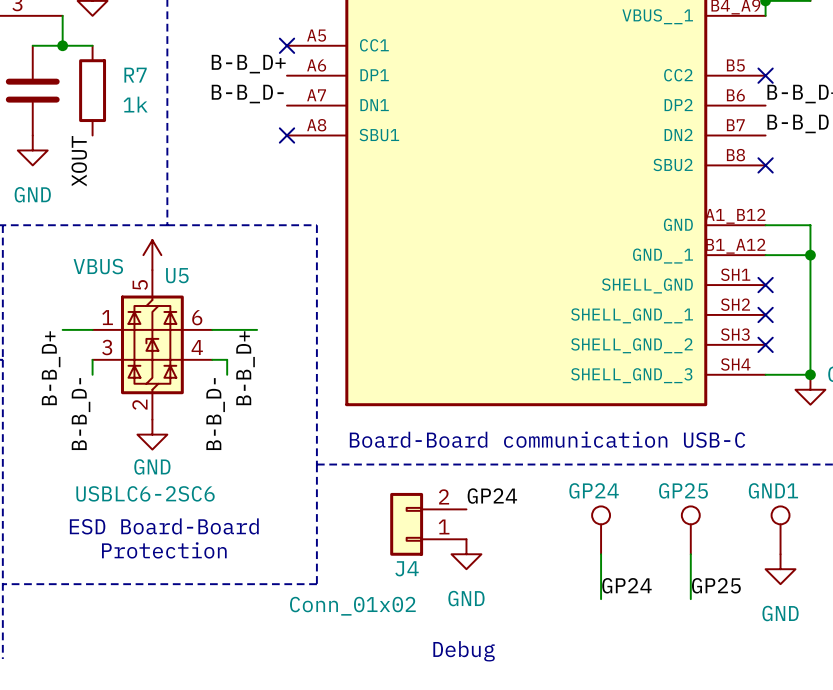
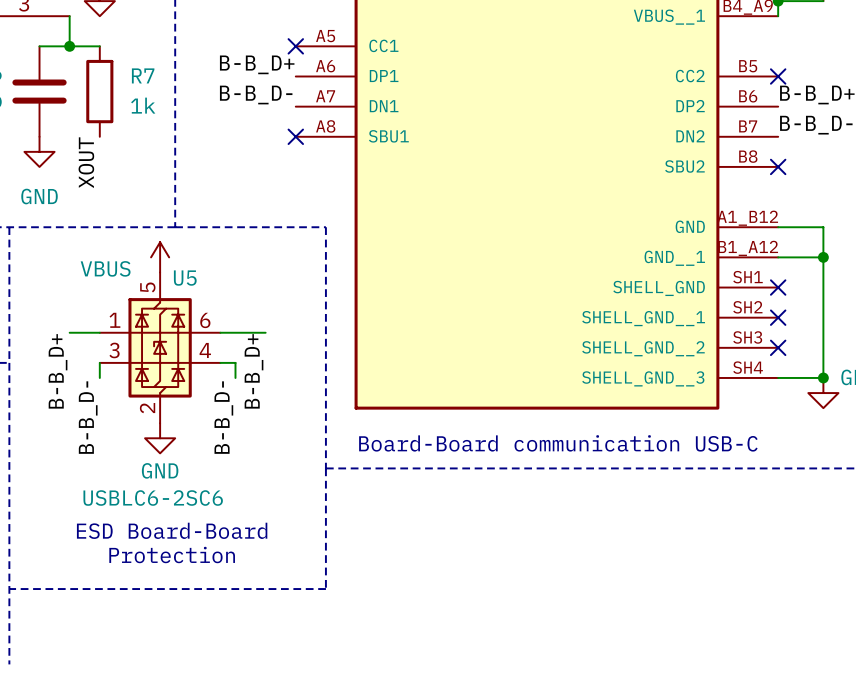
label: GP24 (492, 496) -> none
J4: Conn_01x02 (428, 524) -> none
GP24: (601, 530) -> none
GP25: (690, 530) -> none
GND1: (780, 530) -> none
power symbol: GND (466, 554) -> none
wire: (601, 554) (601, 599) -> none
wire: (690, 554) (690, 599) -> none
power symbol: GND (780, 569) -> none
label: GP24 (626, 585) -> none
label: GP25 (716, 585) -> none
text: Debug (464, 651) -> none

